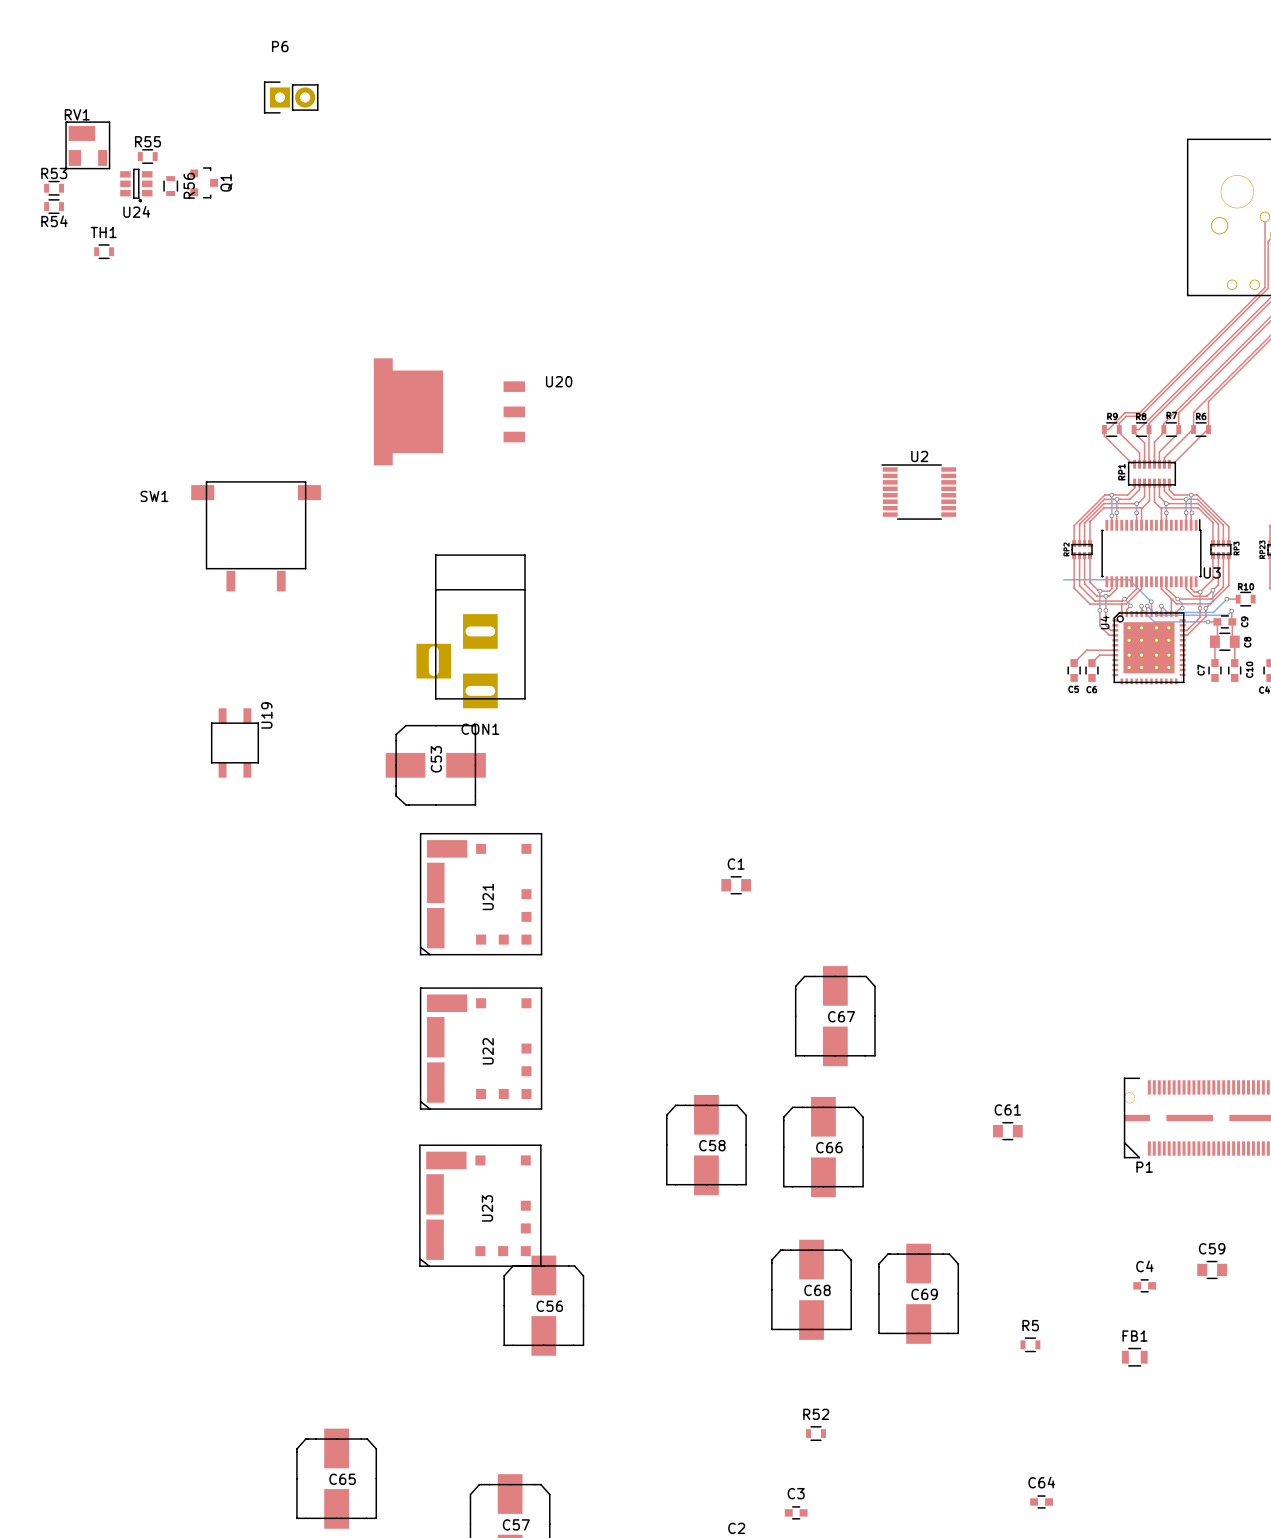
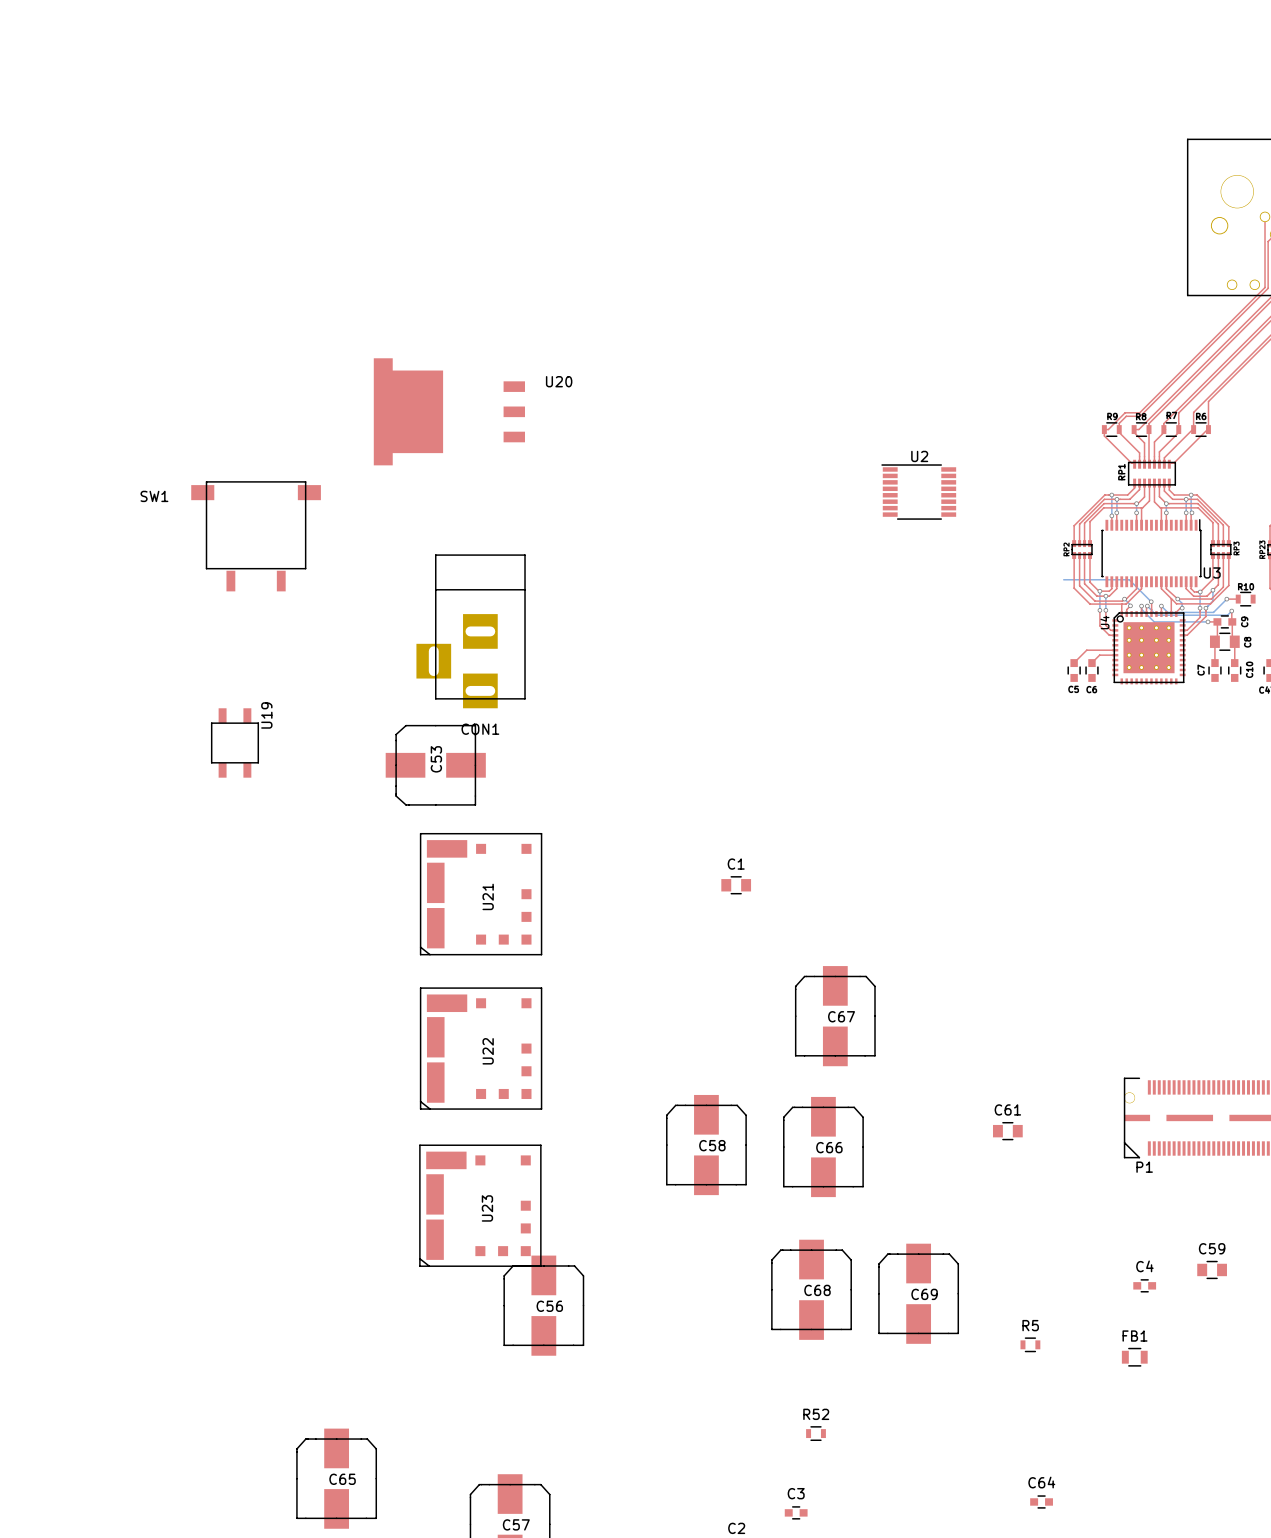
P6: (291, 97) -> none
RV1: (87, 145) -> none
R55: (147, 156) -> none
Q1: (204, 182) -> none
U24: (136, 185) -> none
R56: (170, 186) -> none
R53: (54, 188) -> none
R54: (54, 206) -> none
TH1: (104, 251) -> none

